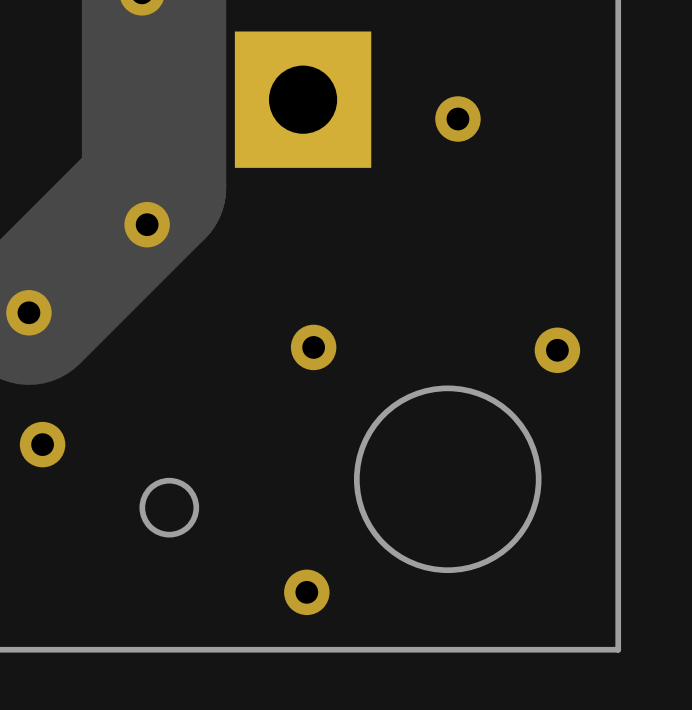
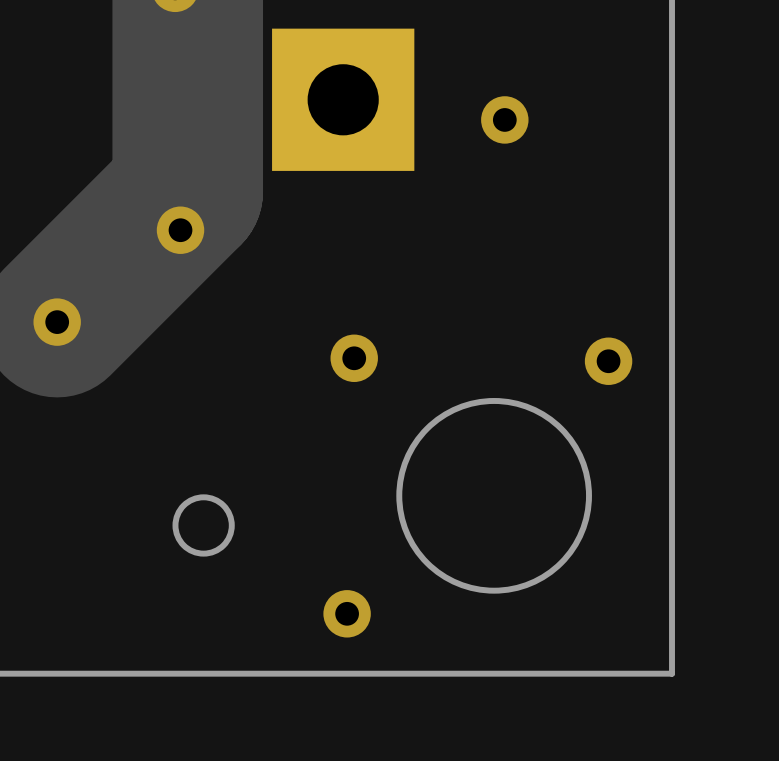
via: (42, 444) -> none

